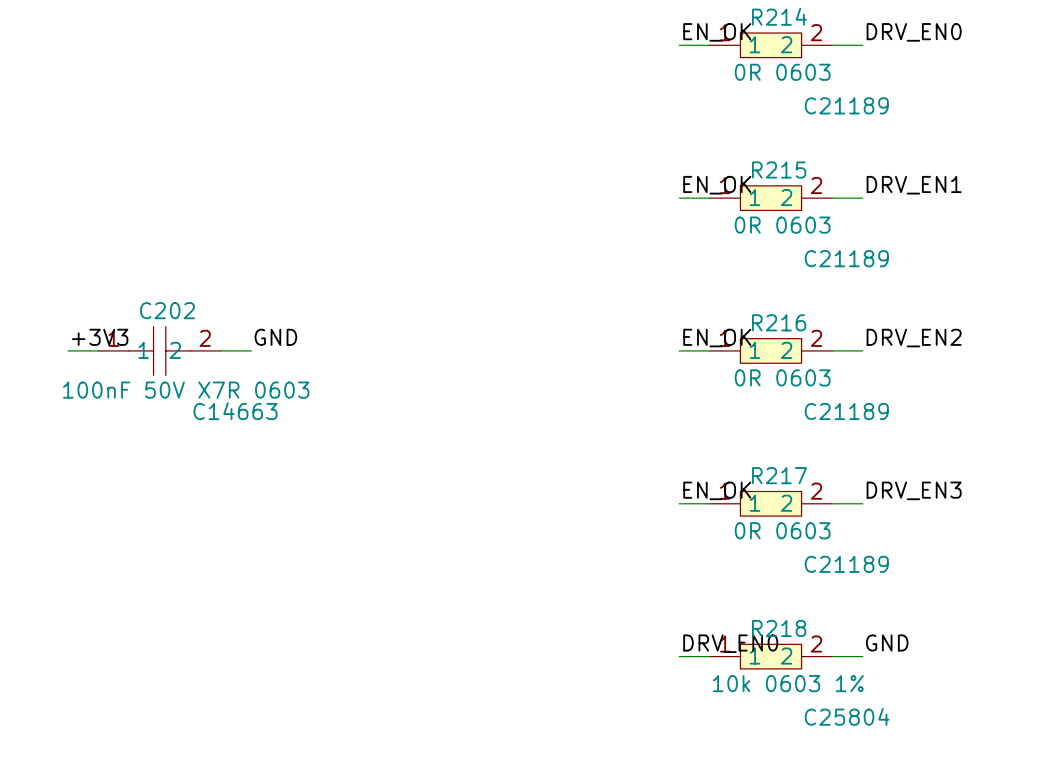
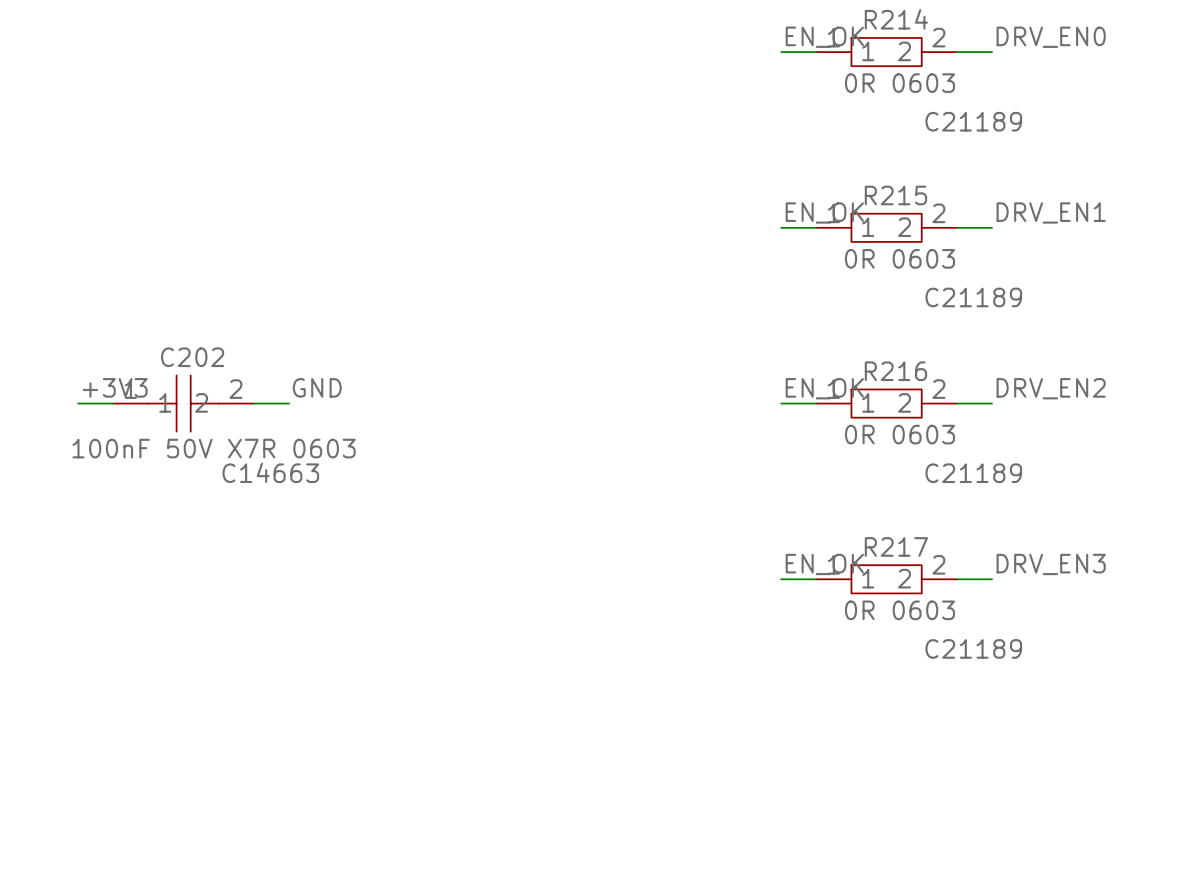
label: GND (887, 642) -> none
label: DRV_EN0 (730, 643) -> none
wire: (679, 656) (709, 656) -> none
R218: 10k 0603 1% (771, 656) -> none
wire: (832, 656) (862, 656) -> none

